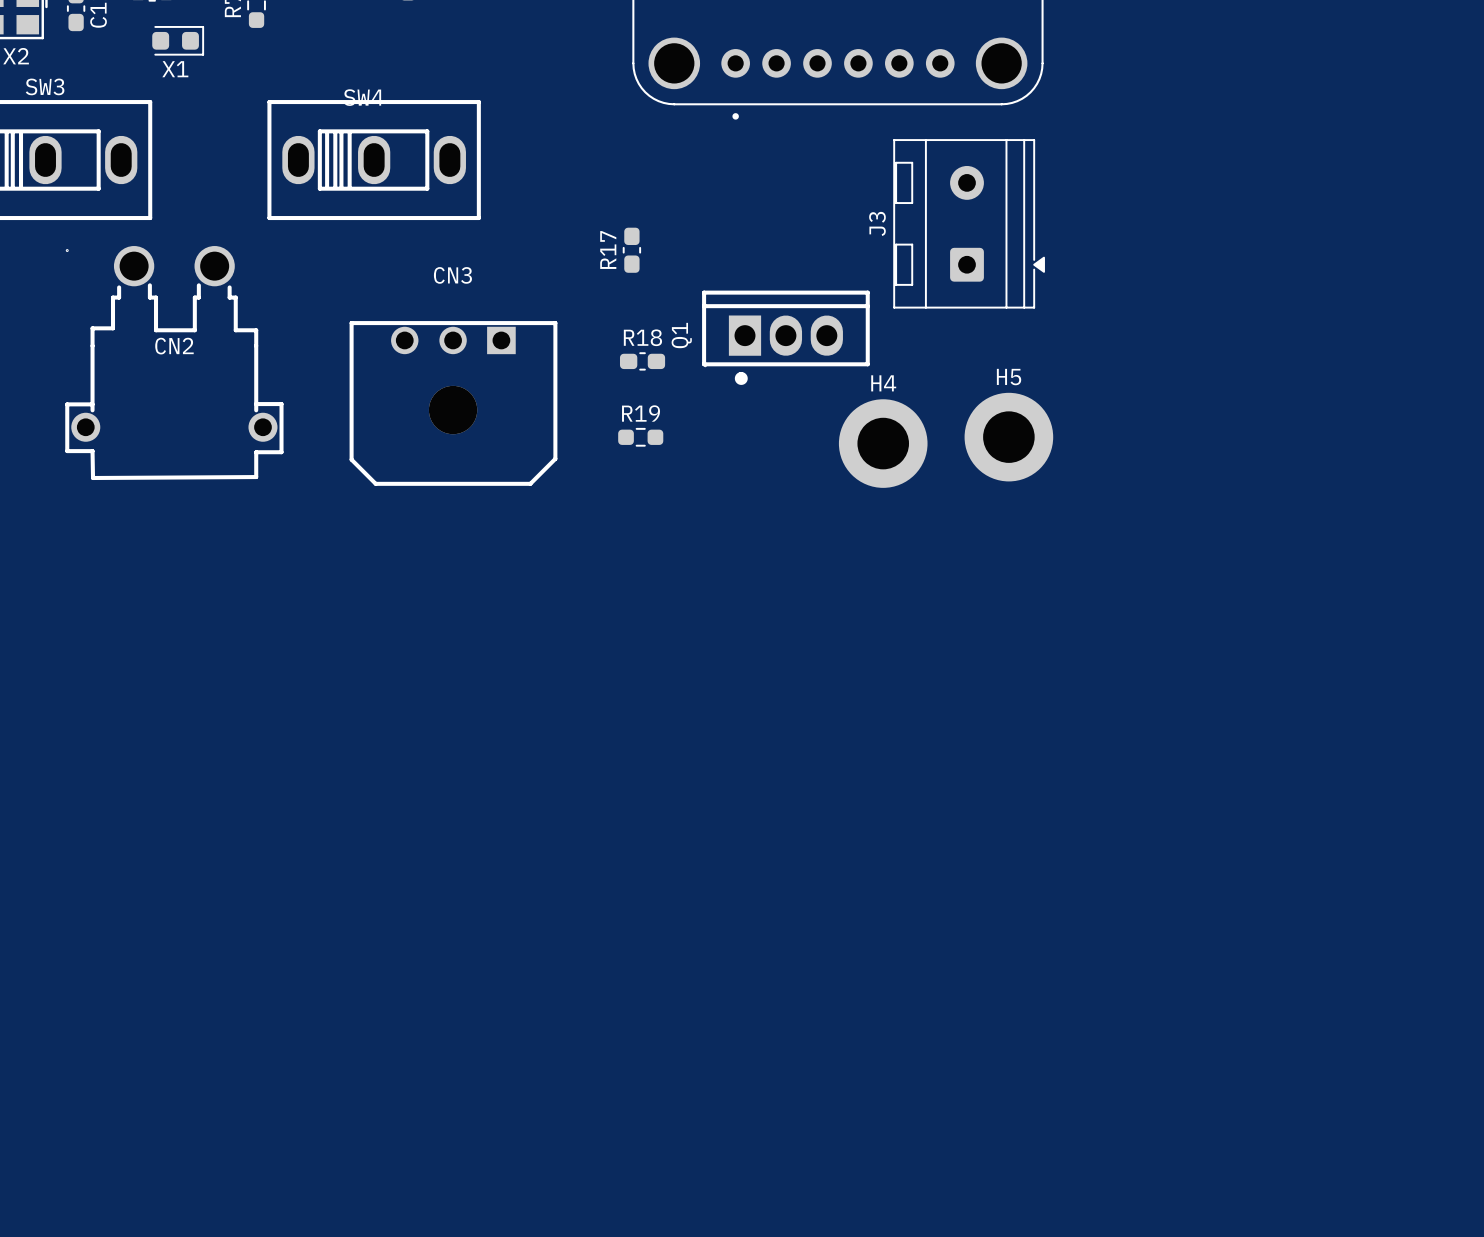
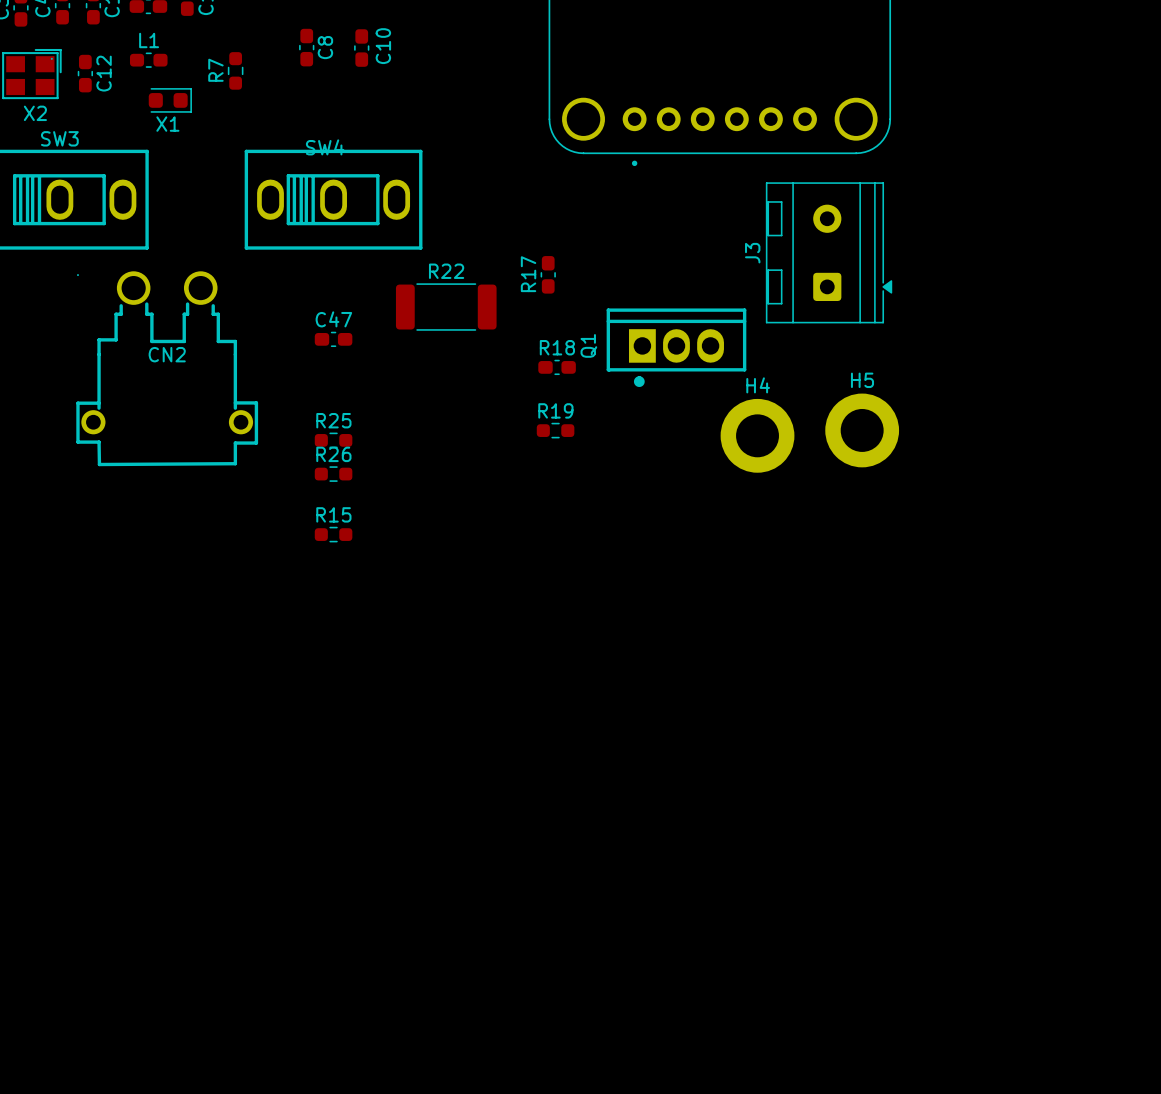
R22: none -> (446, 307)
C47: none -> (333, 339)
CN3: (453, 403) -> none
R25: none -> (333, 440)
R26: none -> (333, 474)
R15: none -> (333, 534)

